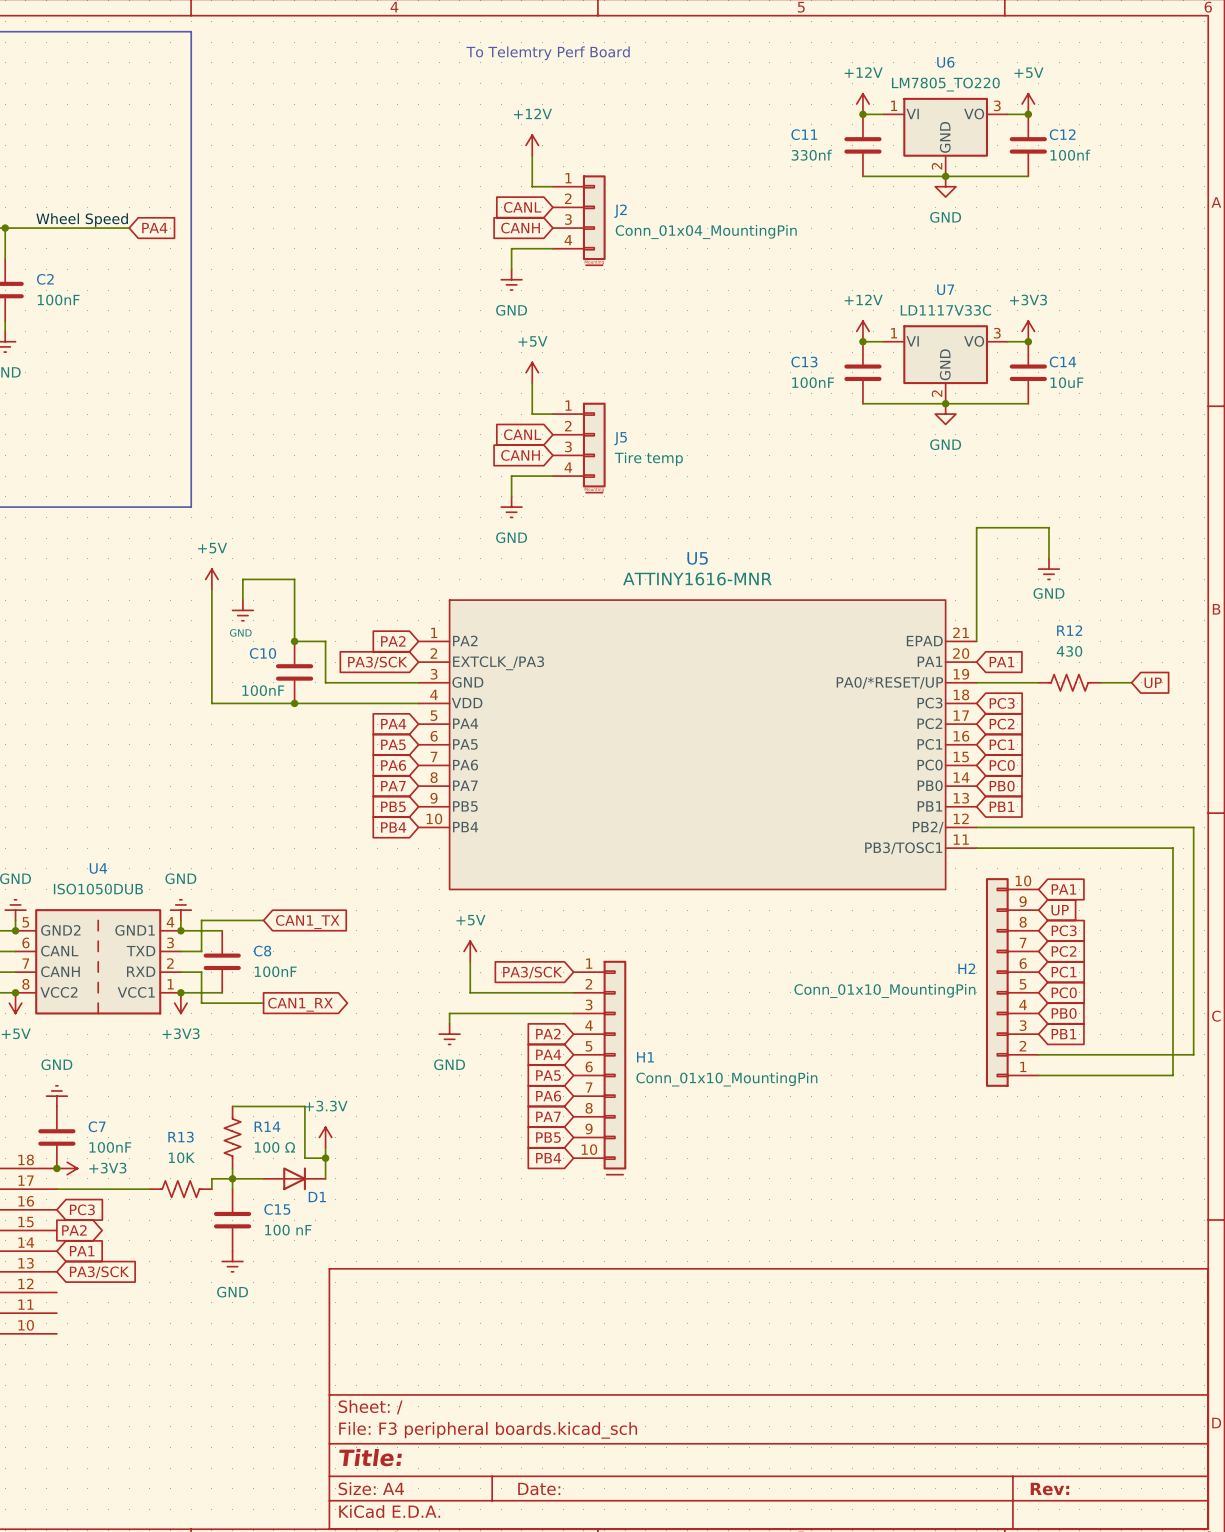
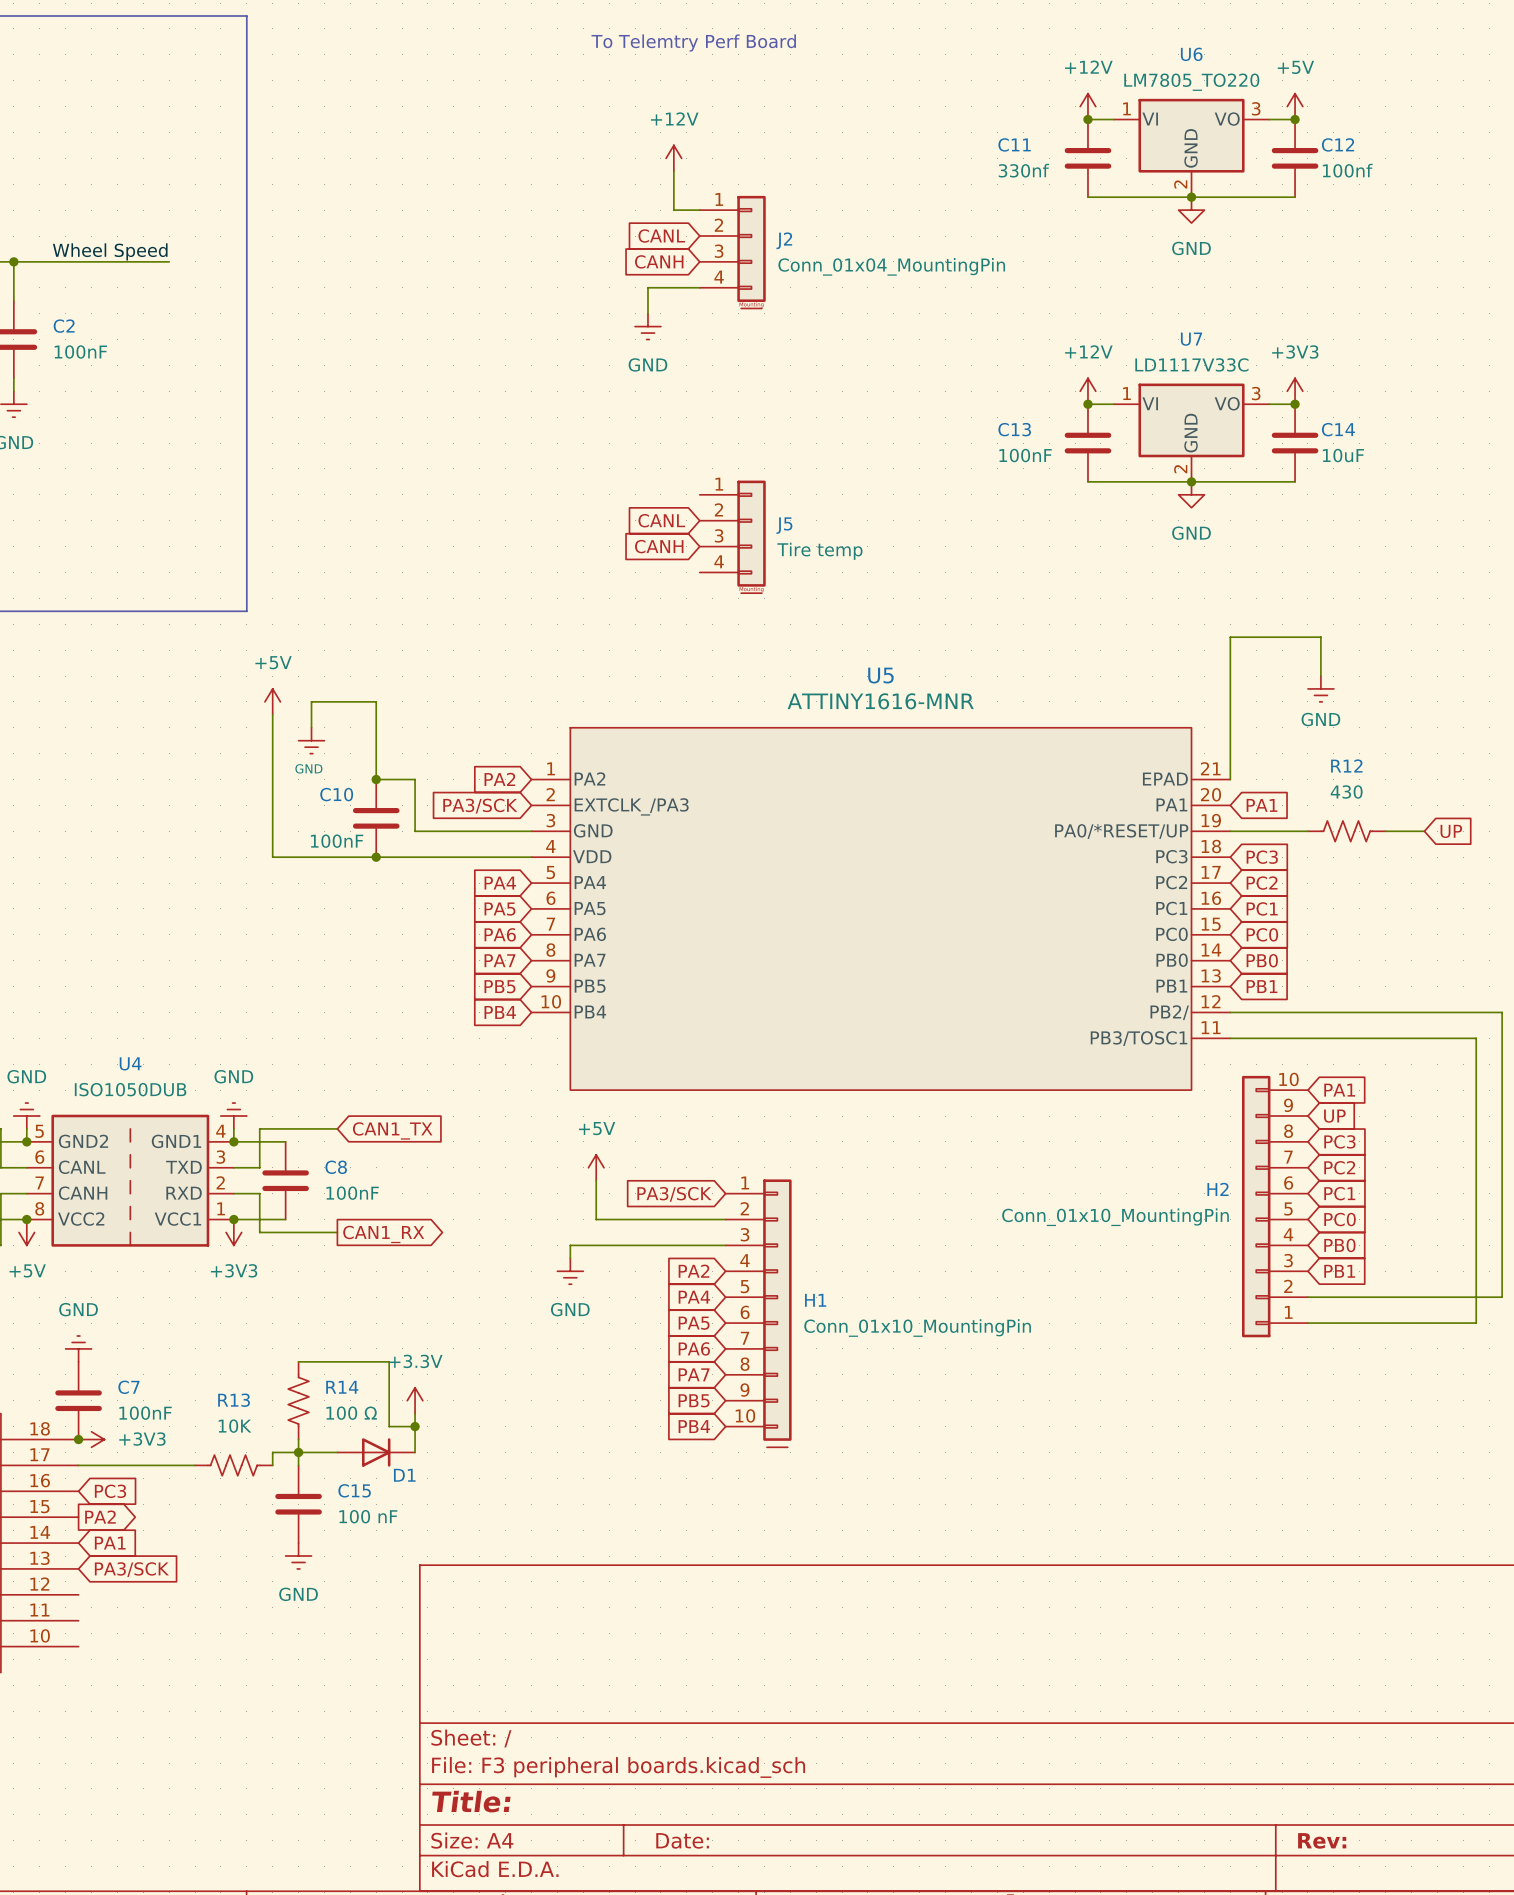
global label: PA4 (154, 228) -> none
power symbol: +5V (532, 372) -> none
wire: (532, 383) (532, 414) (552, 414) -> none
wire: (552, 476) (511, 476) (511, 496) -> none
power symbol: GND (511, 507) -> none

